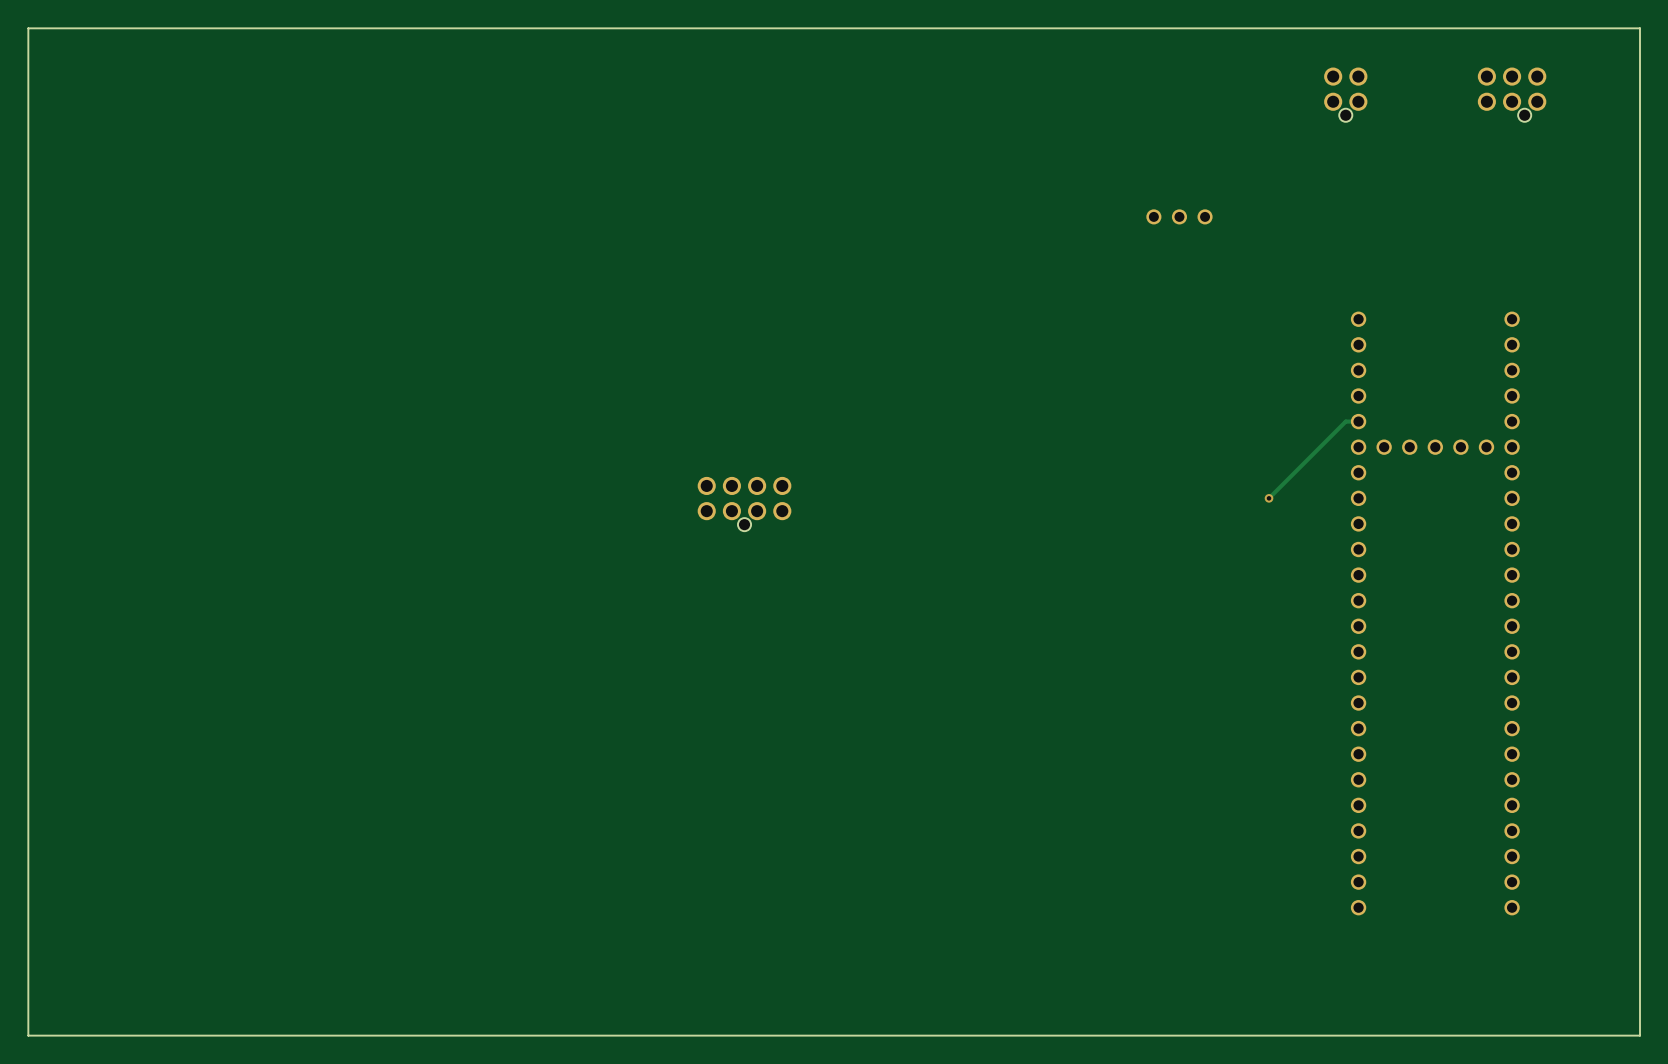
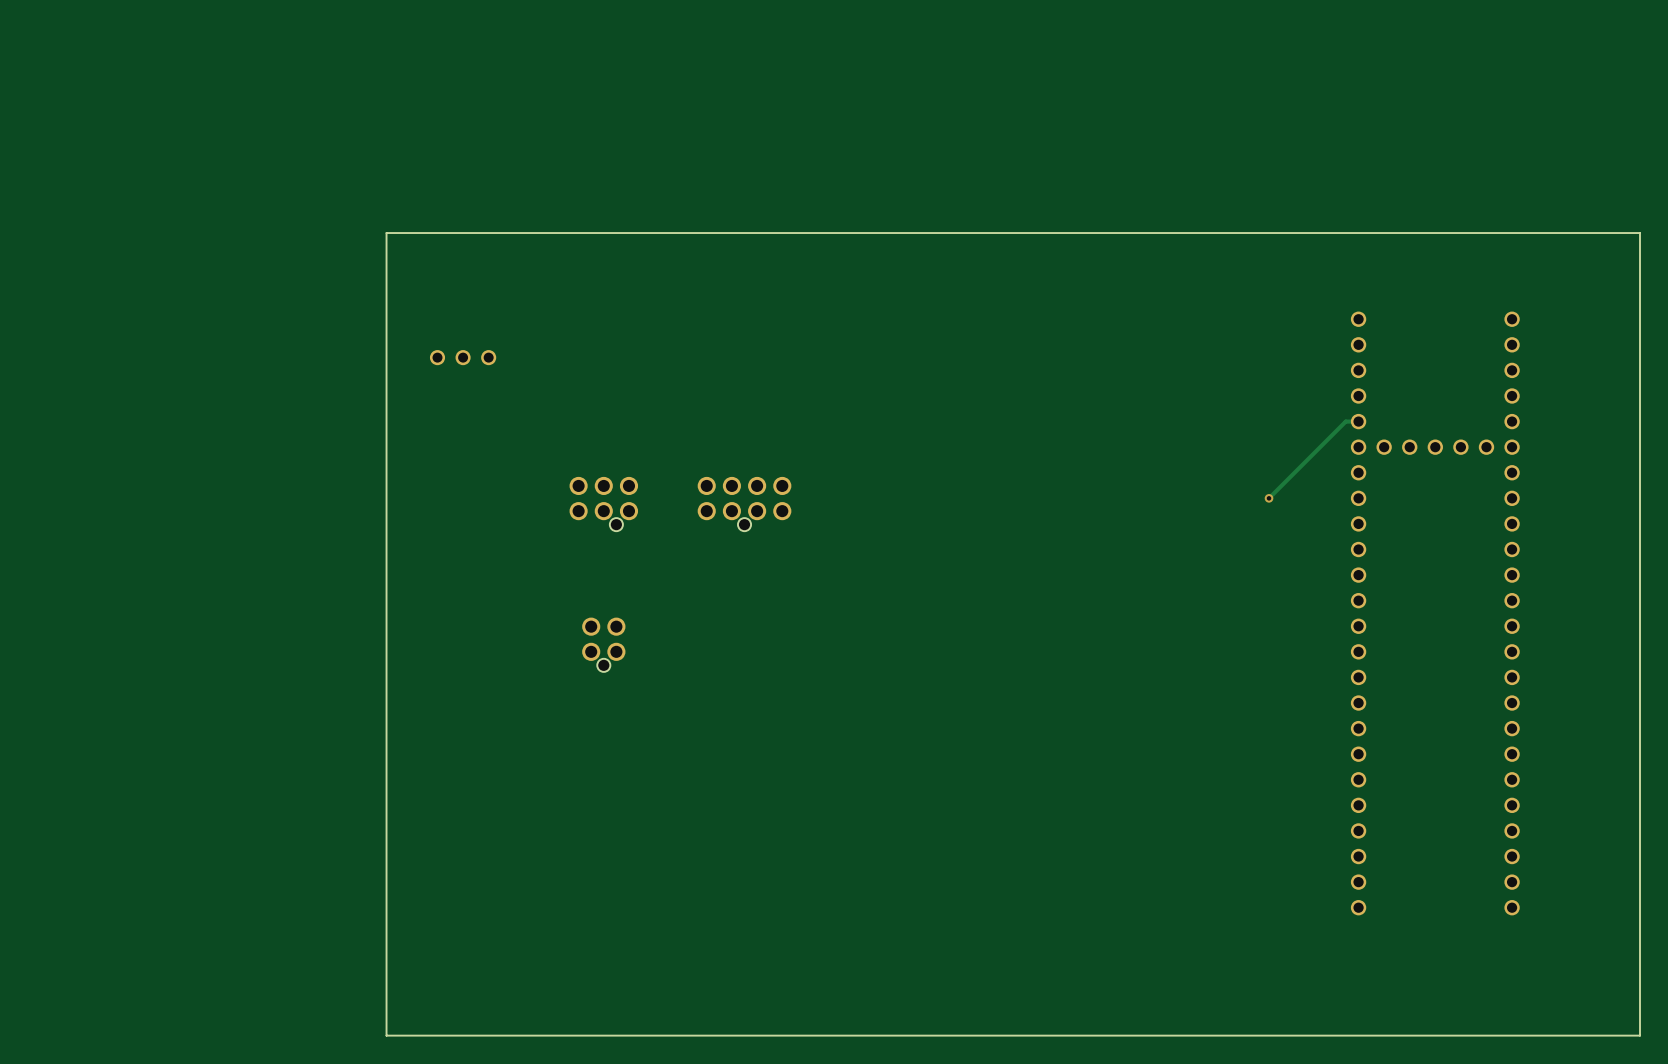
part: (1345, 94) -> none
part: (1512, 94) -> none
part: (1179, 216) -> none
board edge: (1640, 233) (1640, 28) (28, 28) (28, 1035) (386, 1035) -> (1640, 233) (386, 233) (386, 1035)
part: none -> (463, 357)
part: none -> (603, 504)
part: none -> (603, 644)

